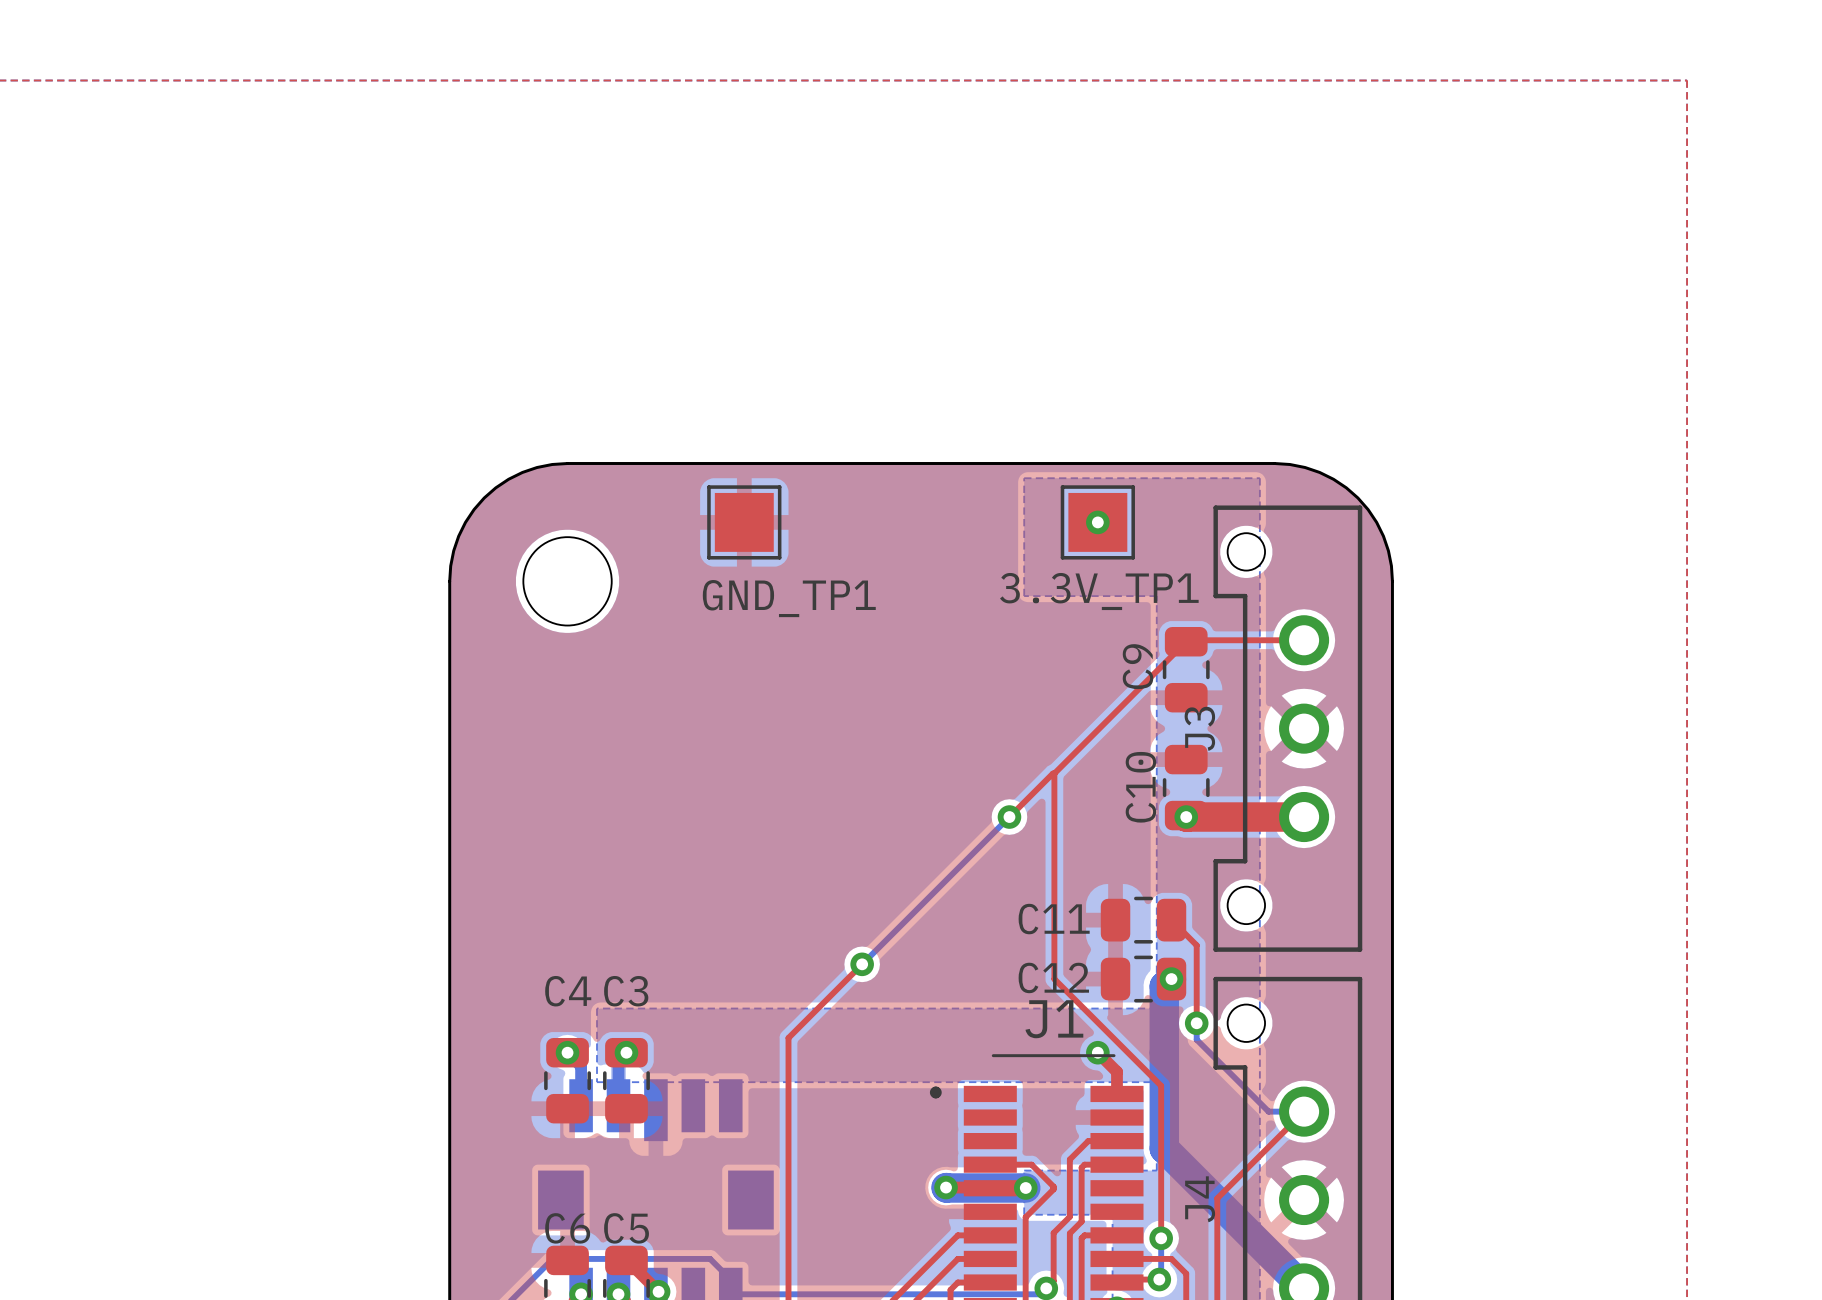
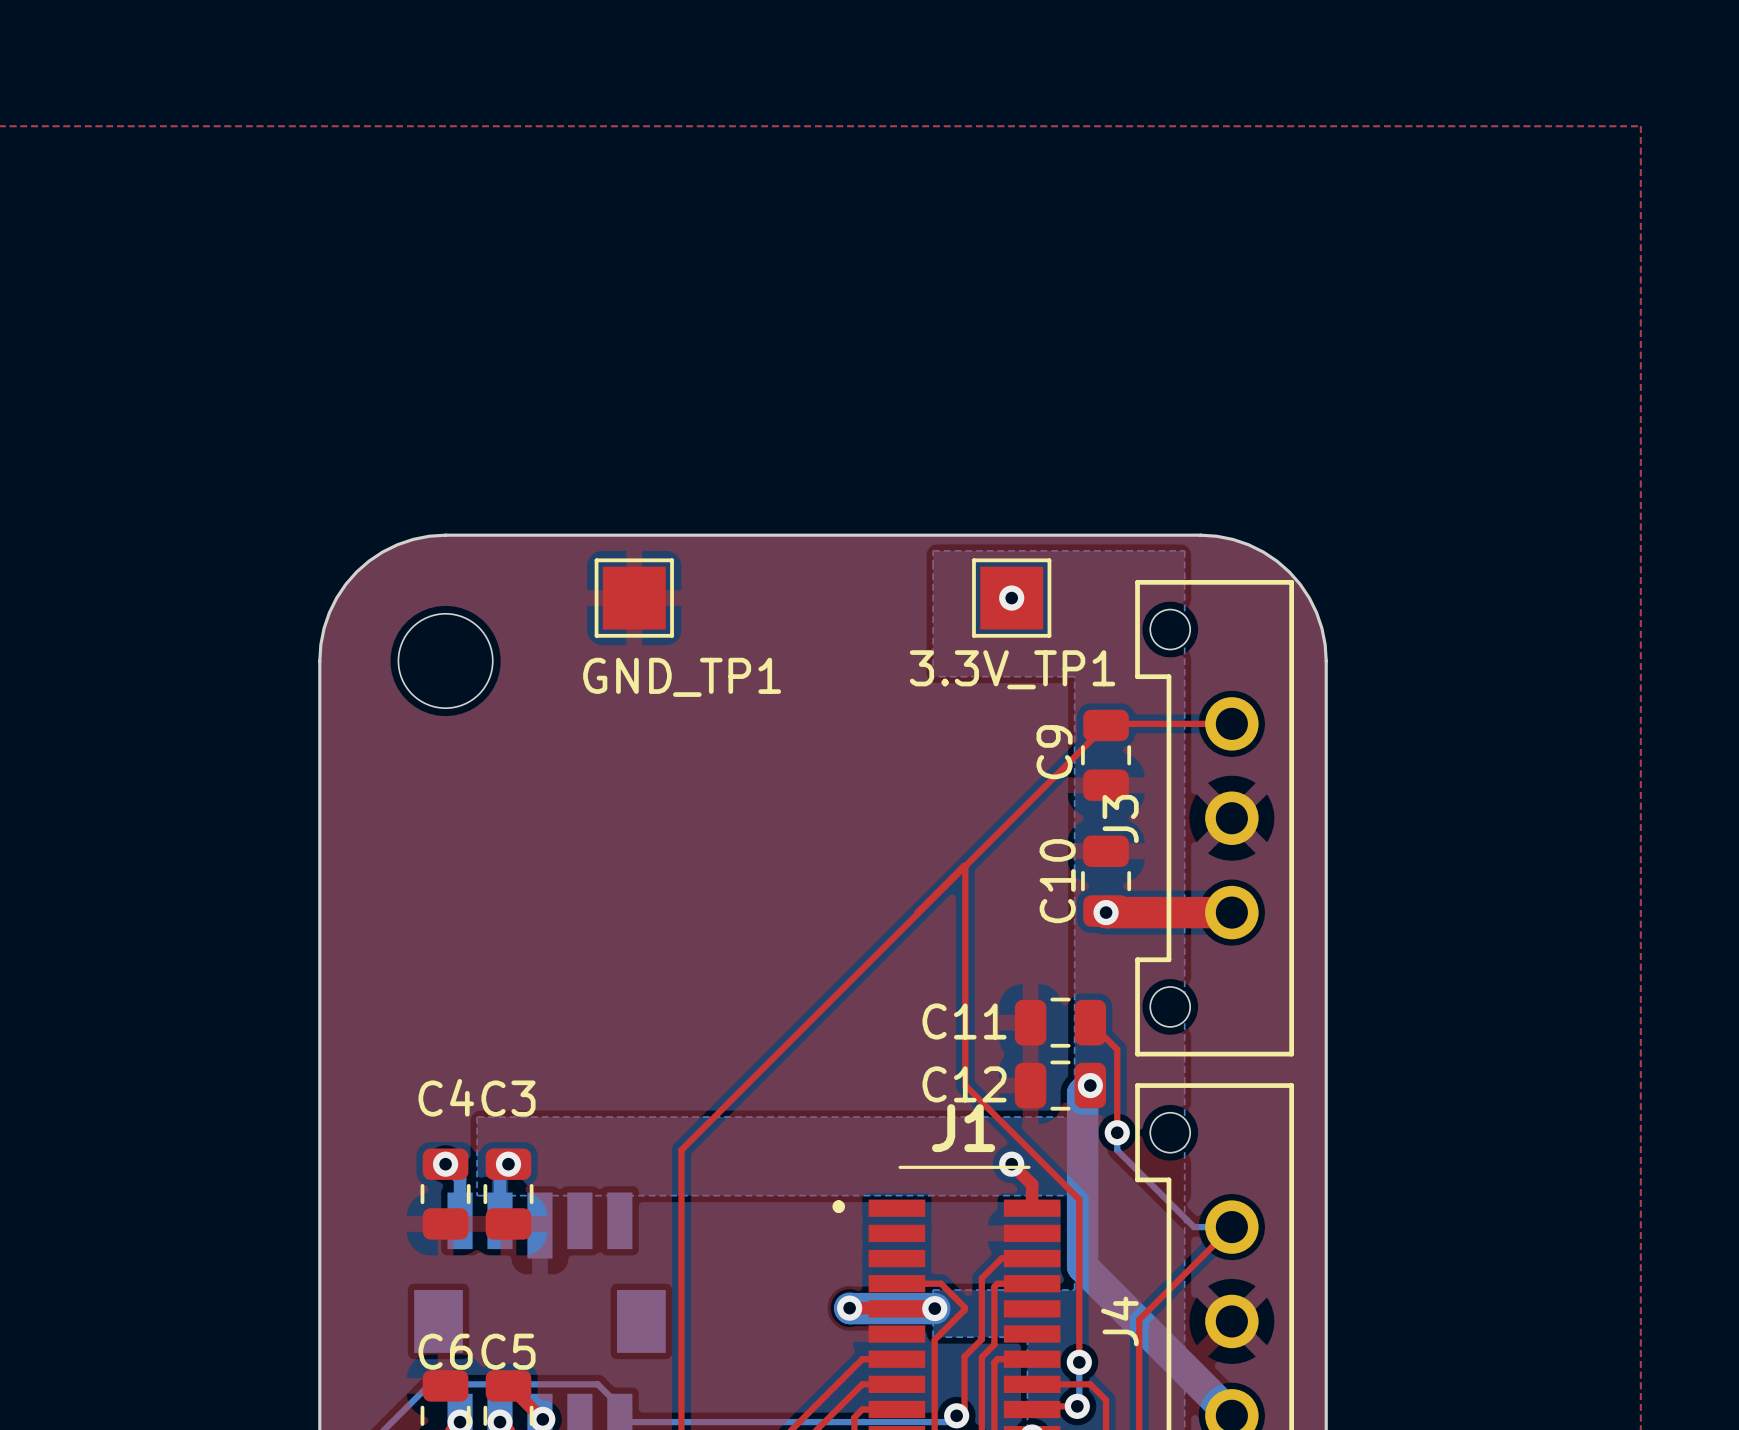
bottom track: (1009, 817) (862, 964) -> none
via: (1009, 817) -> none
top track: (862, 964) (788, 1039) -> (965, 866) (681, 1150)
via: (862, 964) -> none

